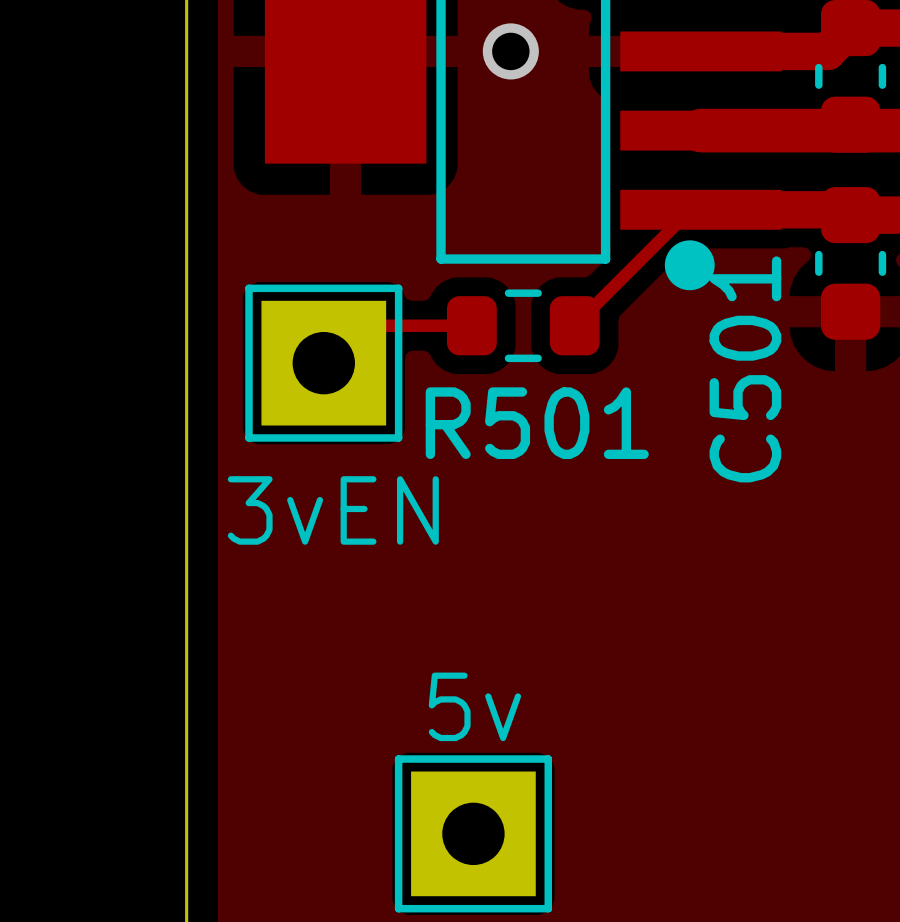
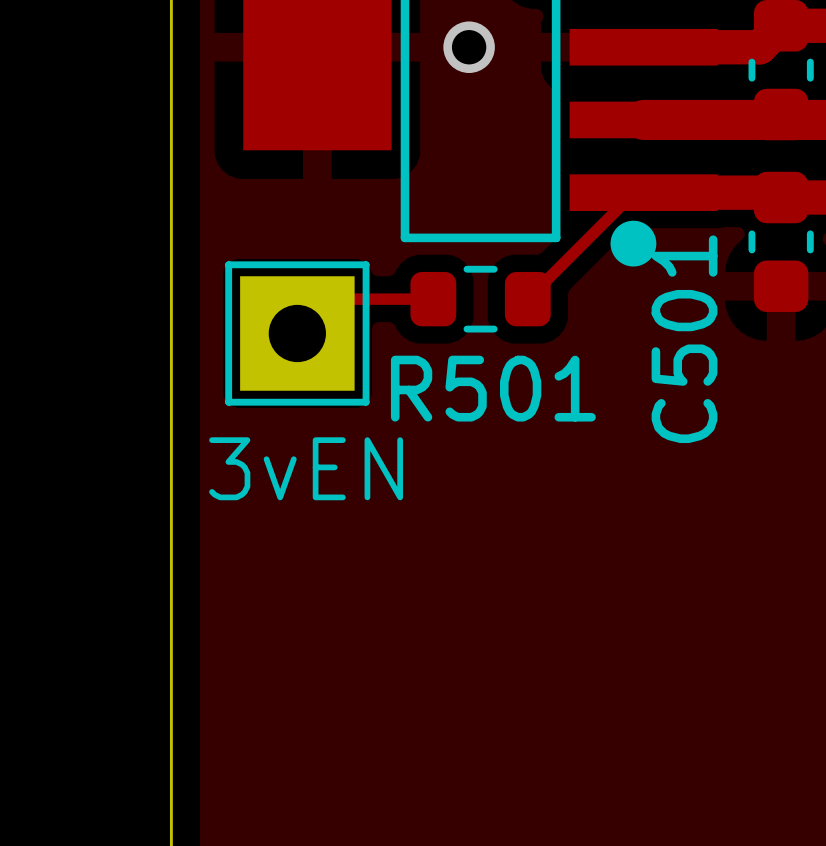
part: (473, 833) -> none

